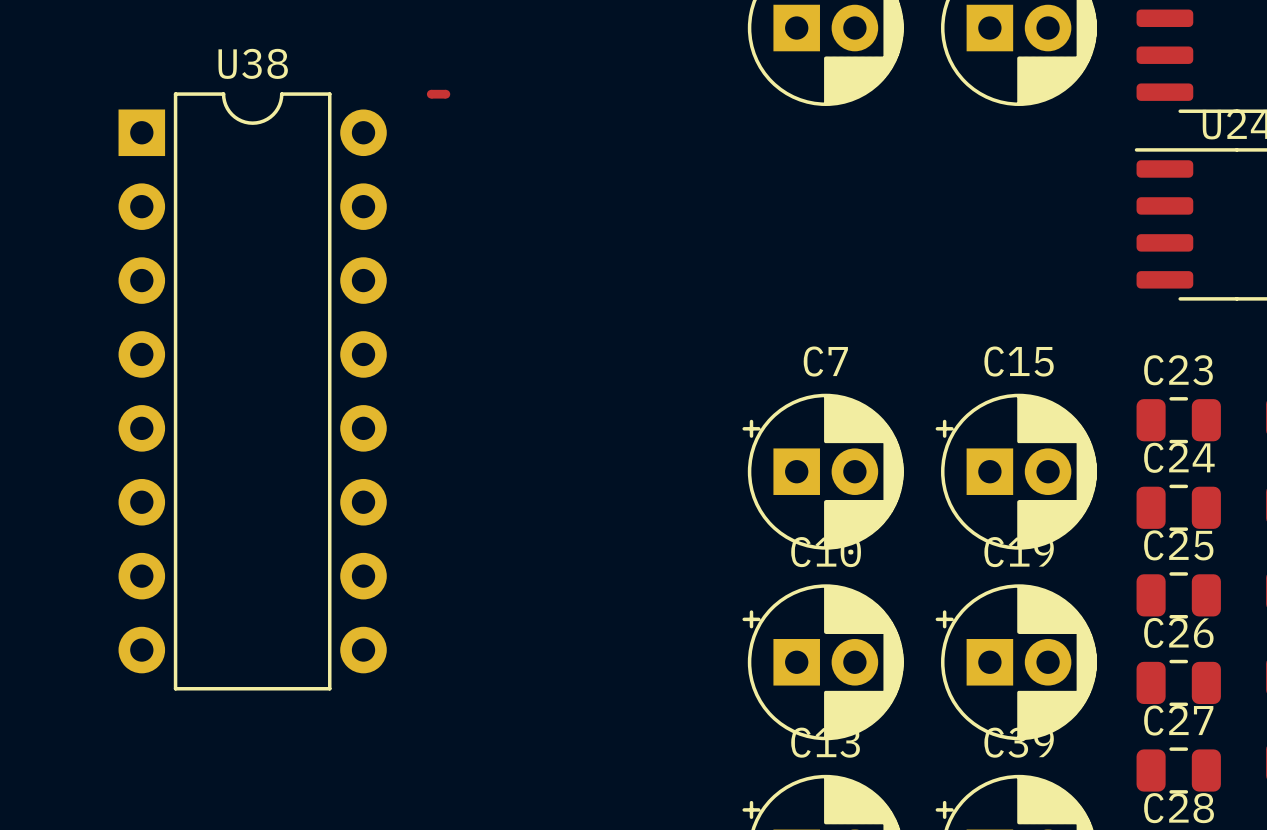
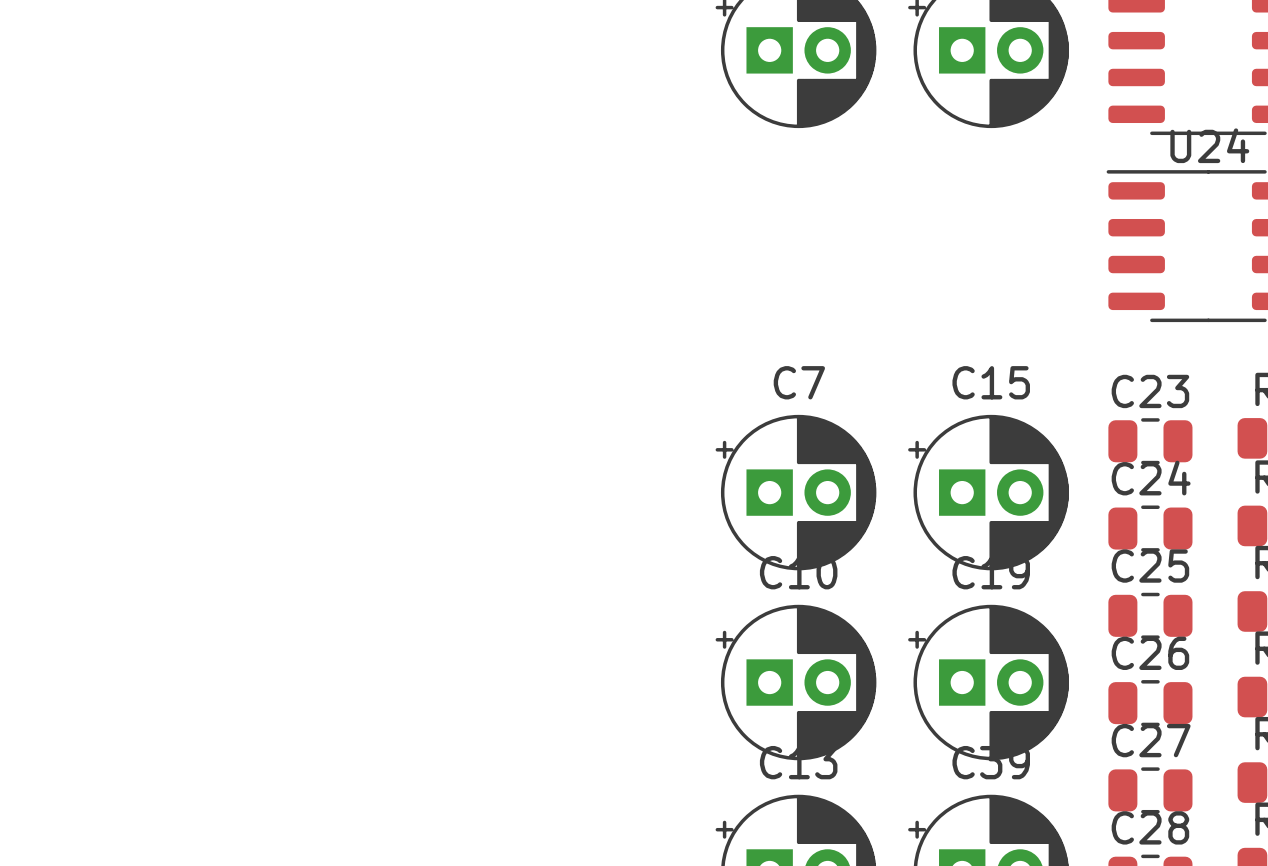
part: (438, 94) -> none
U38: (252, 391) -> none

